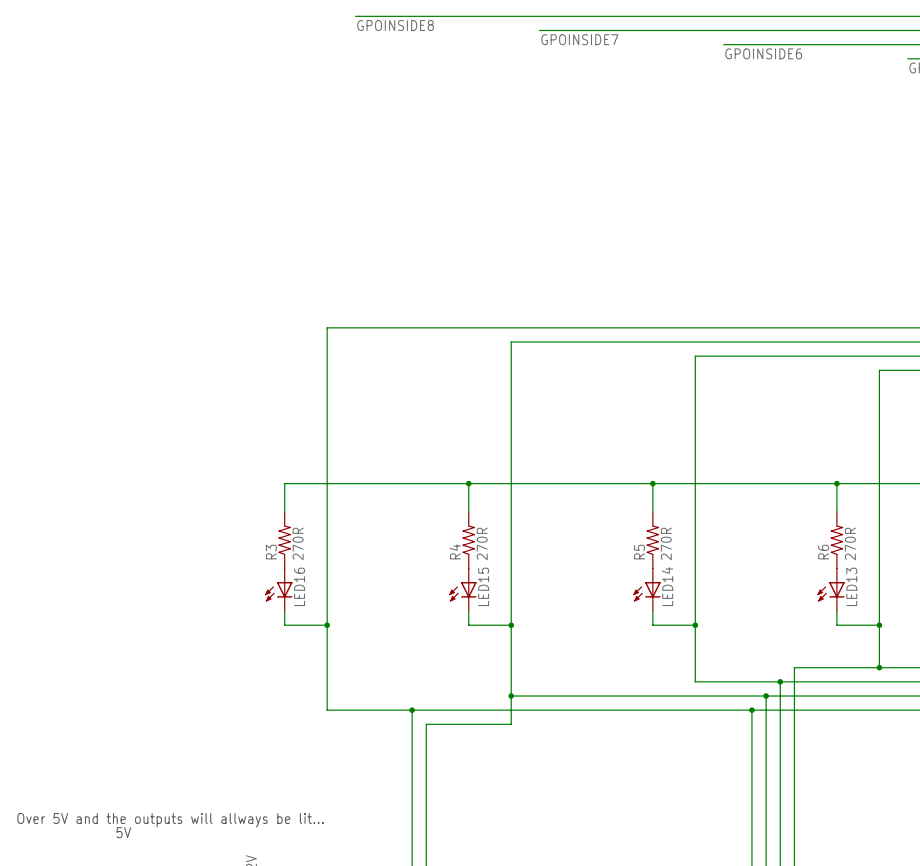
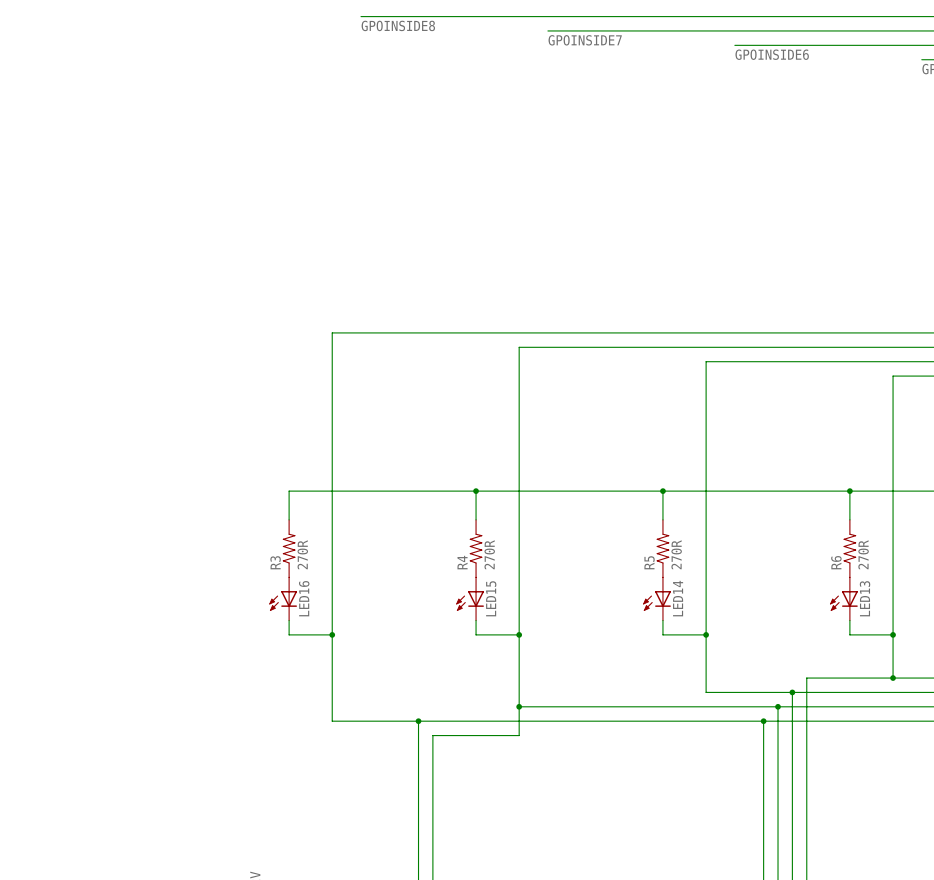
text: Over 5V and the outputs will allways be lit... (170, 820) -> none
text: 5V (123, 832) -> none

